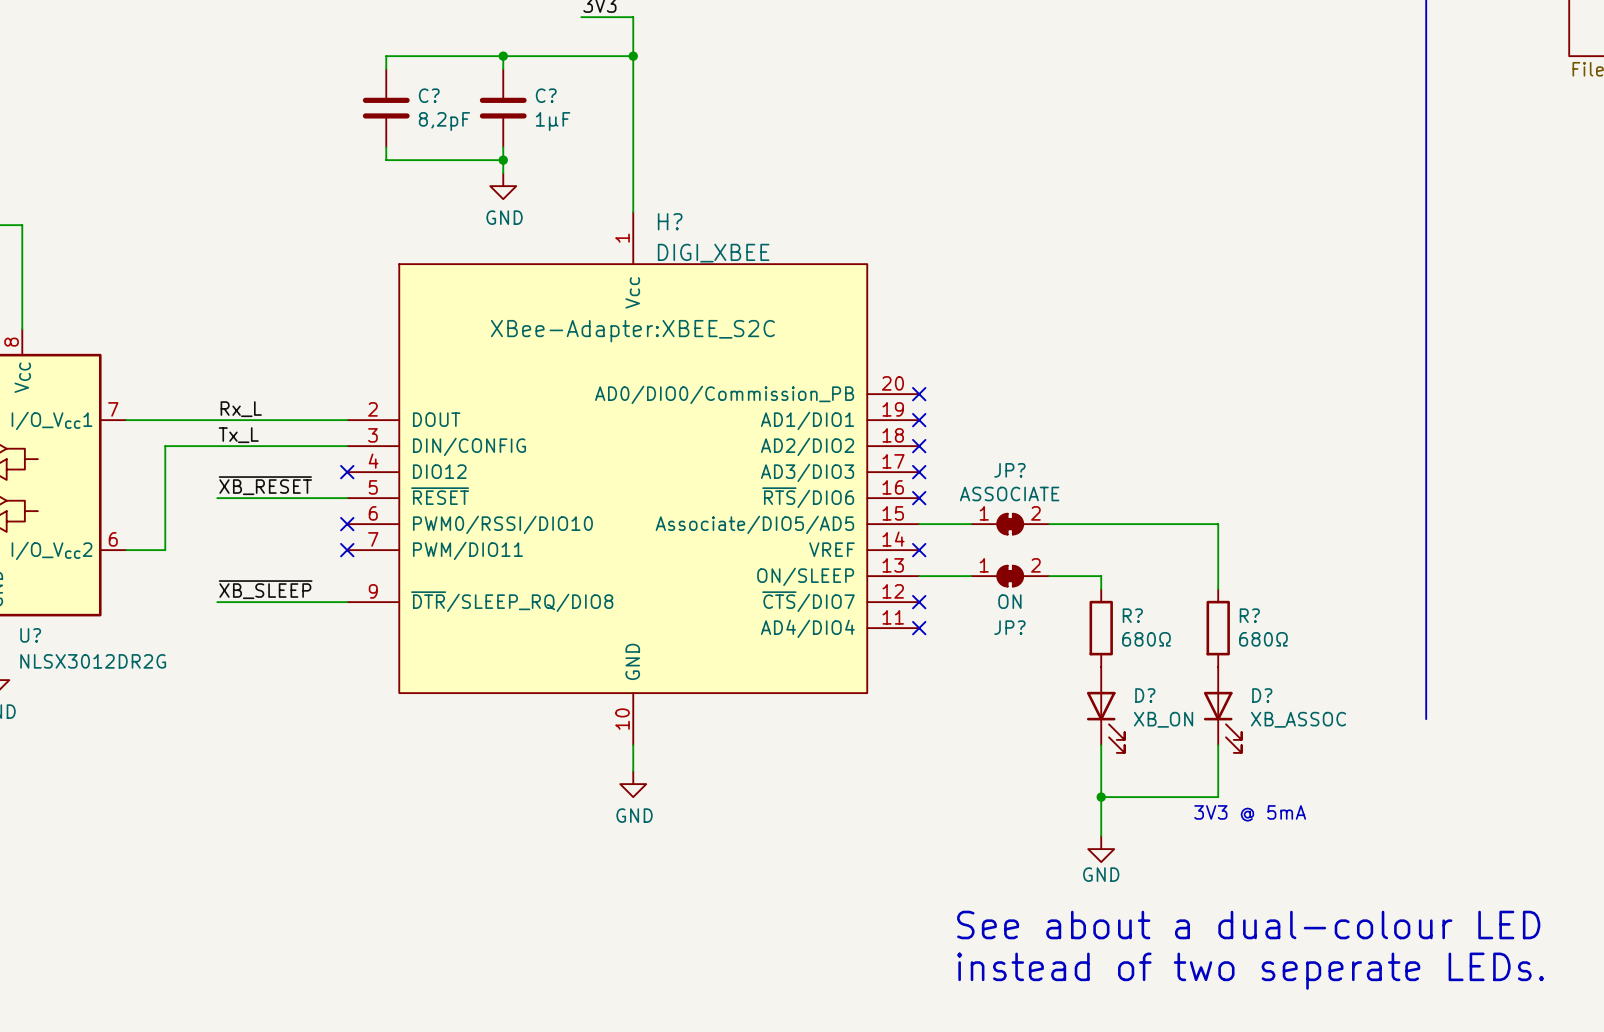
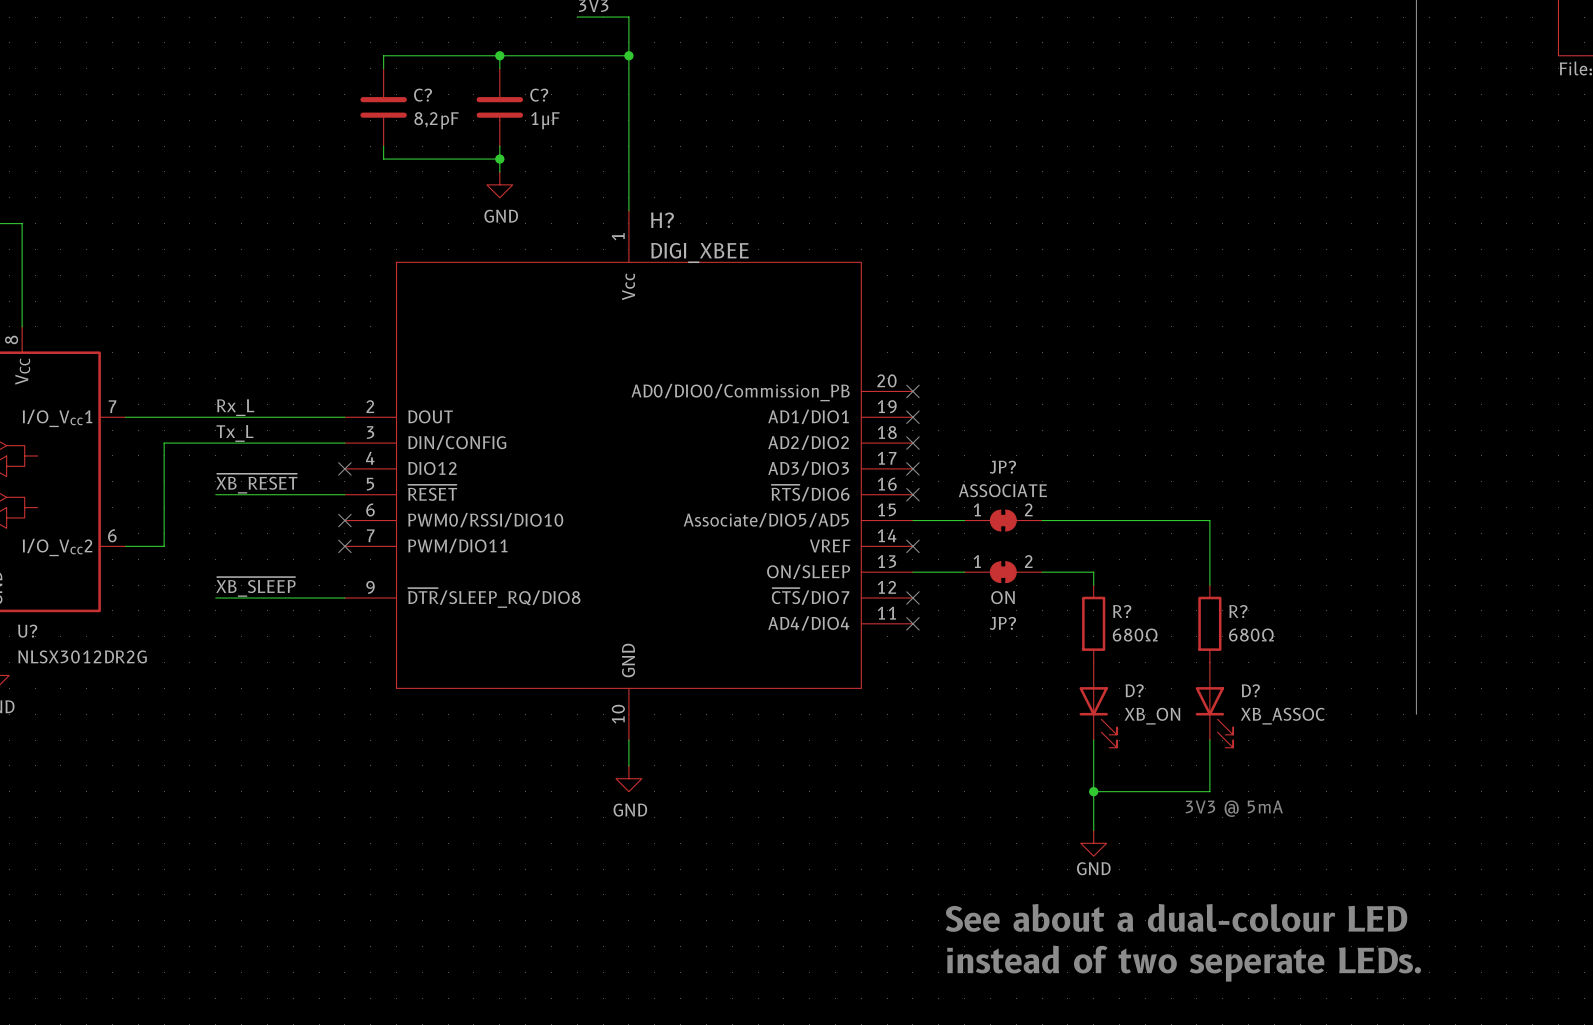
H? text: XBee-Adapter:XBEE_S2C (632, 331) -> none

